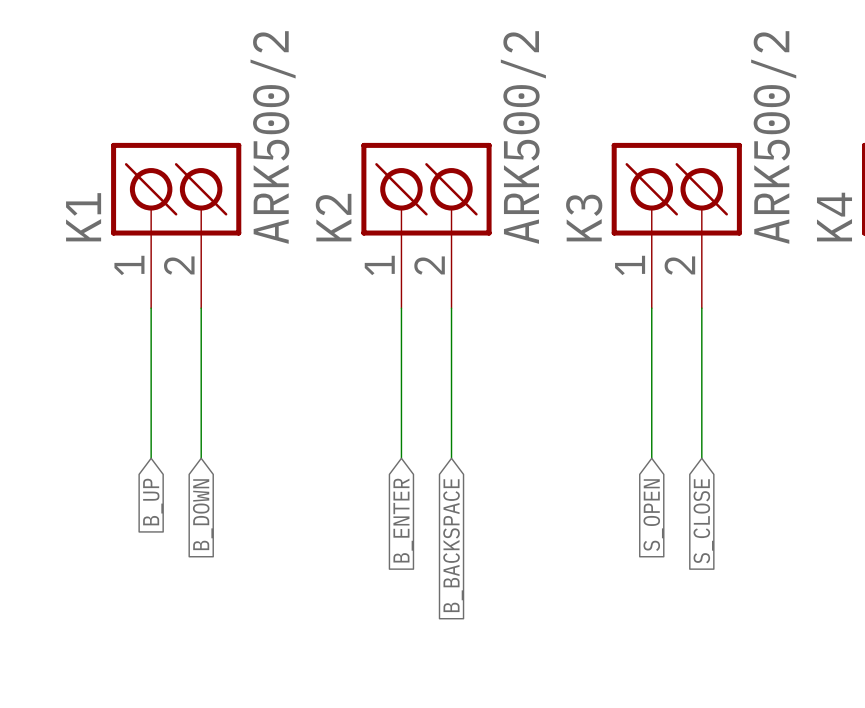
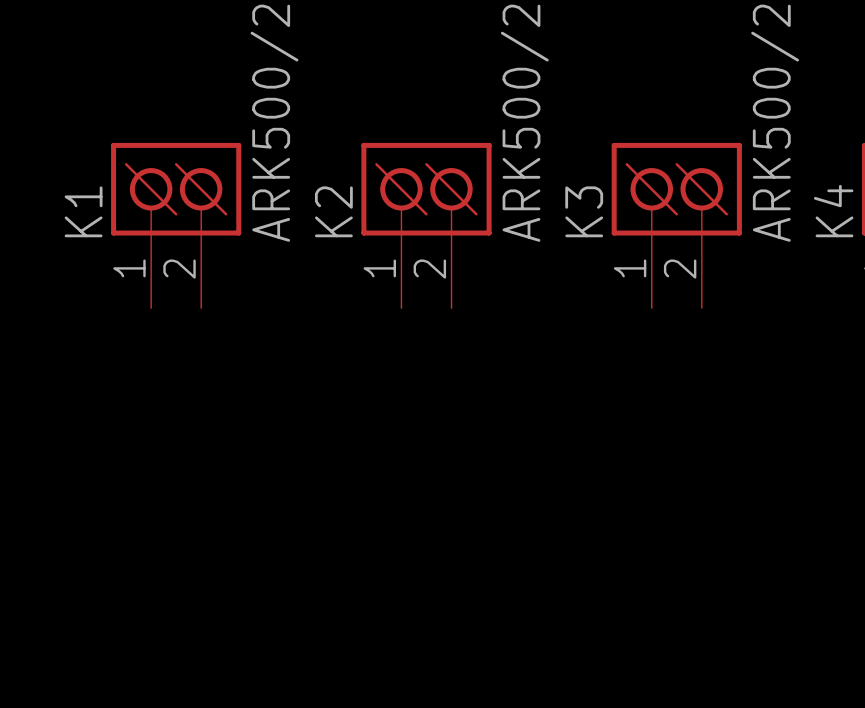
wire: (151, 308) (151, 458) -> none
wire: (201, 308) (201, 458) -> none
wire: (401, 308) (401, 458) -> none
wire: (451, 308) (451, 458) -> none
wire: (651, 308) (651, 458) -> none
wire: (701, 308) (701, 458) -> none
global label: B_UP (153, 502) -> none
global label: B_DOWN (203, 514) -> none
global label: S_OPEN (653, 515) -> none
global label: B_ENTER (403, 520) -> none
global label: S_CLOSE (703, 521) -> none
global label: B_BACKSPACE (453, 545) -> none

